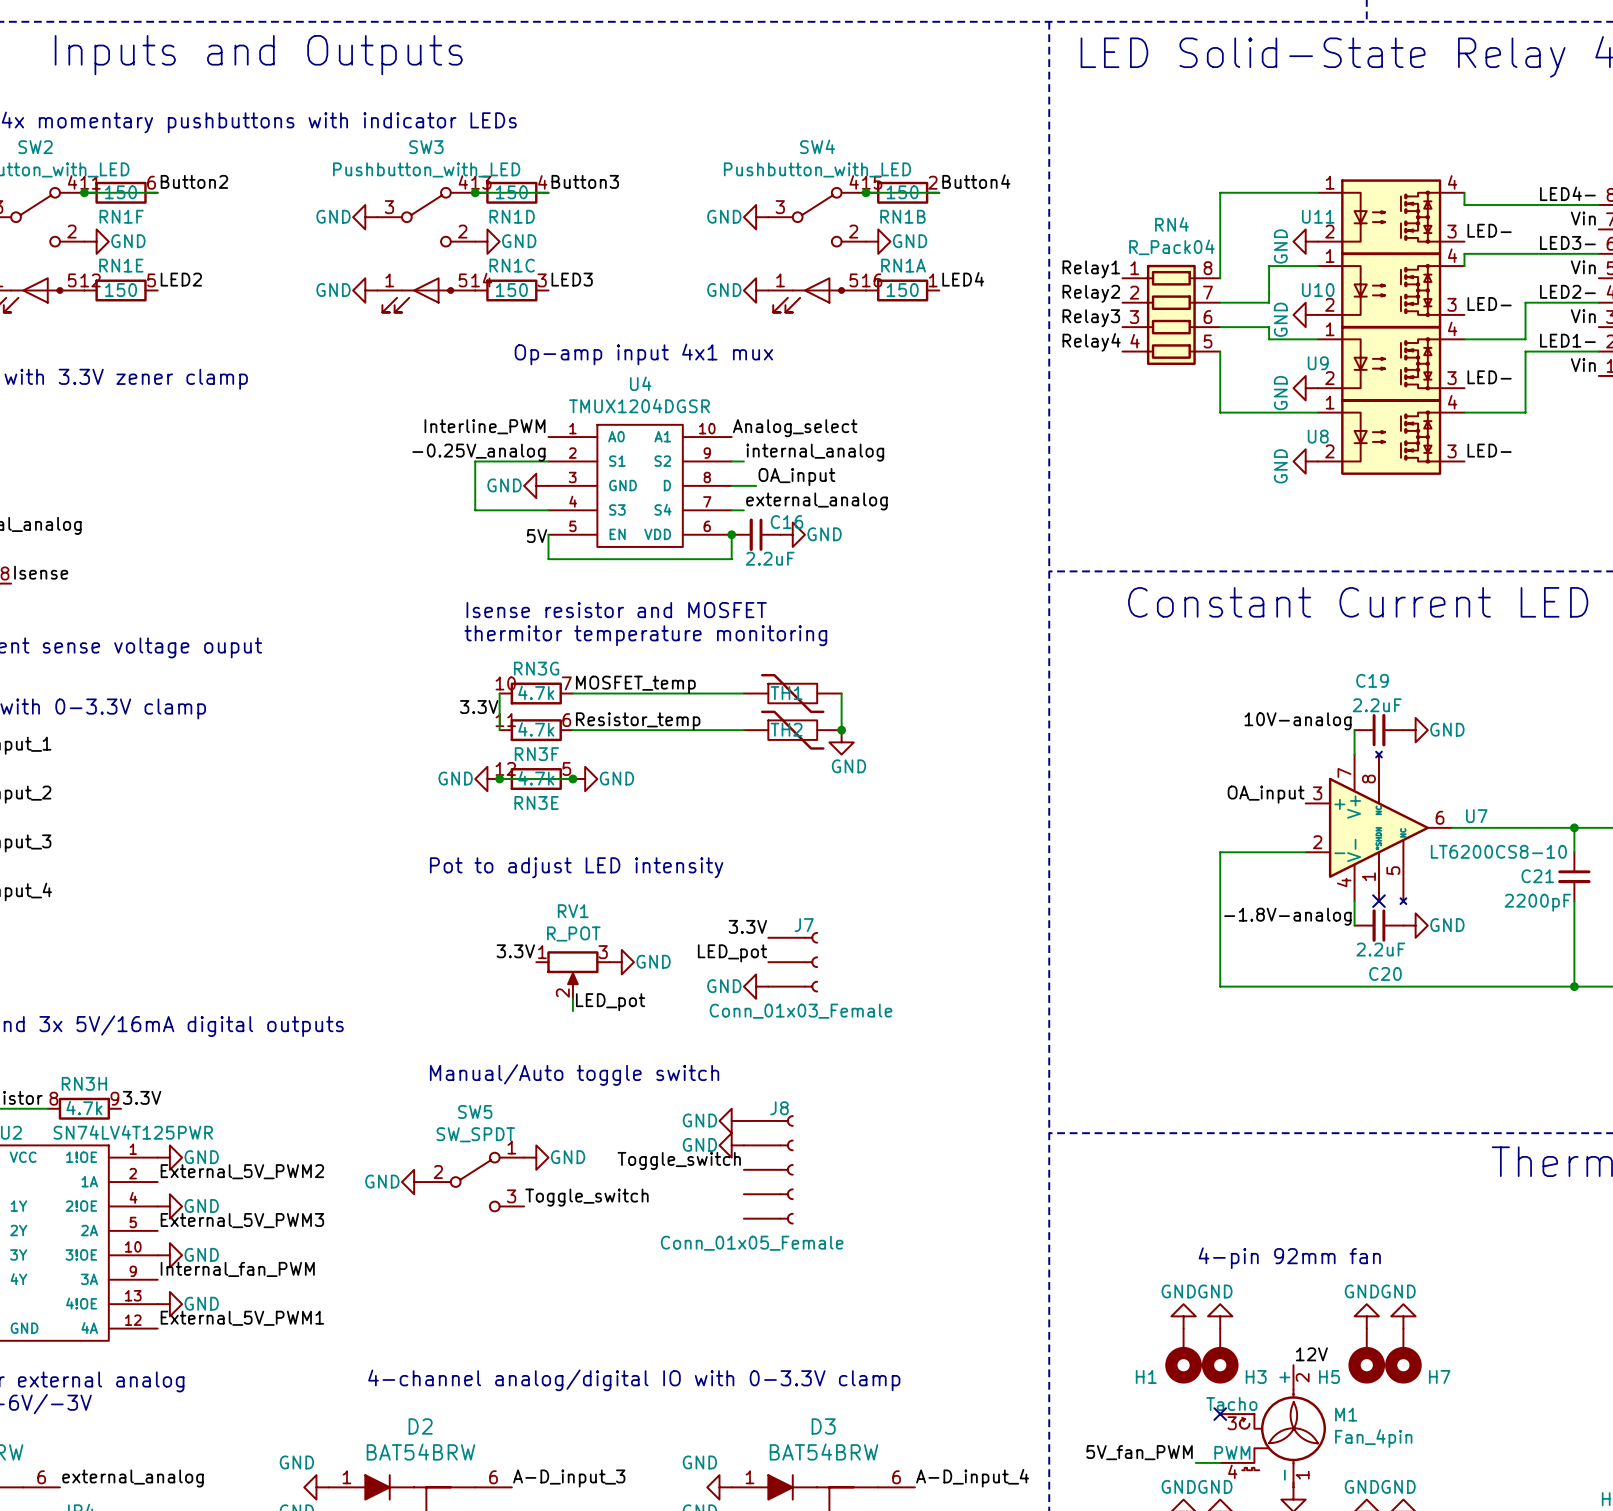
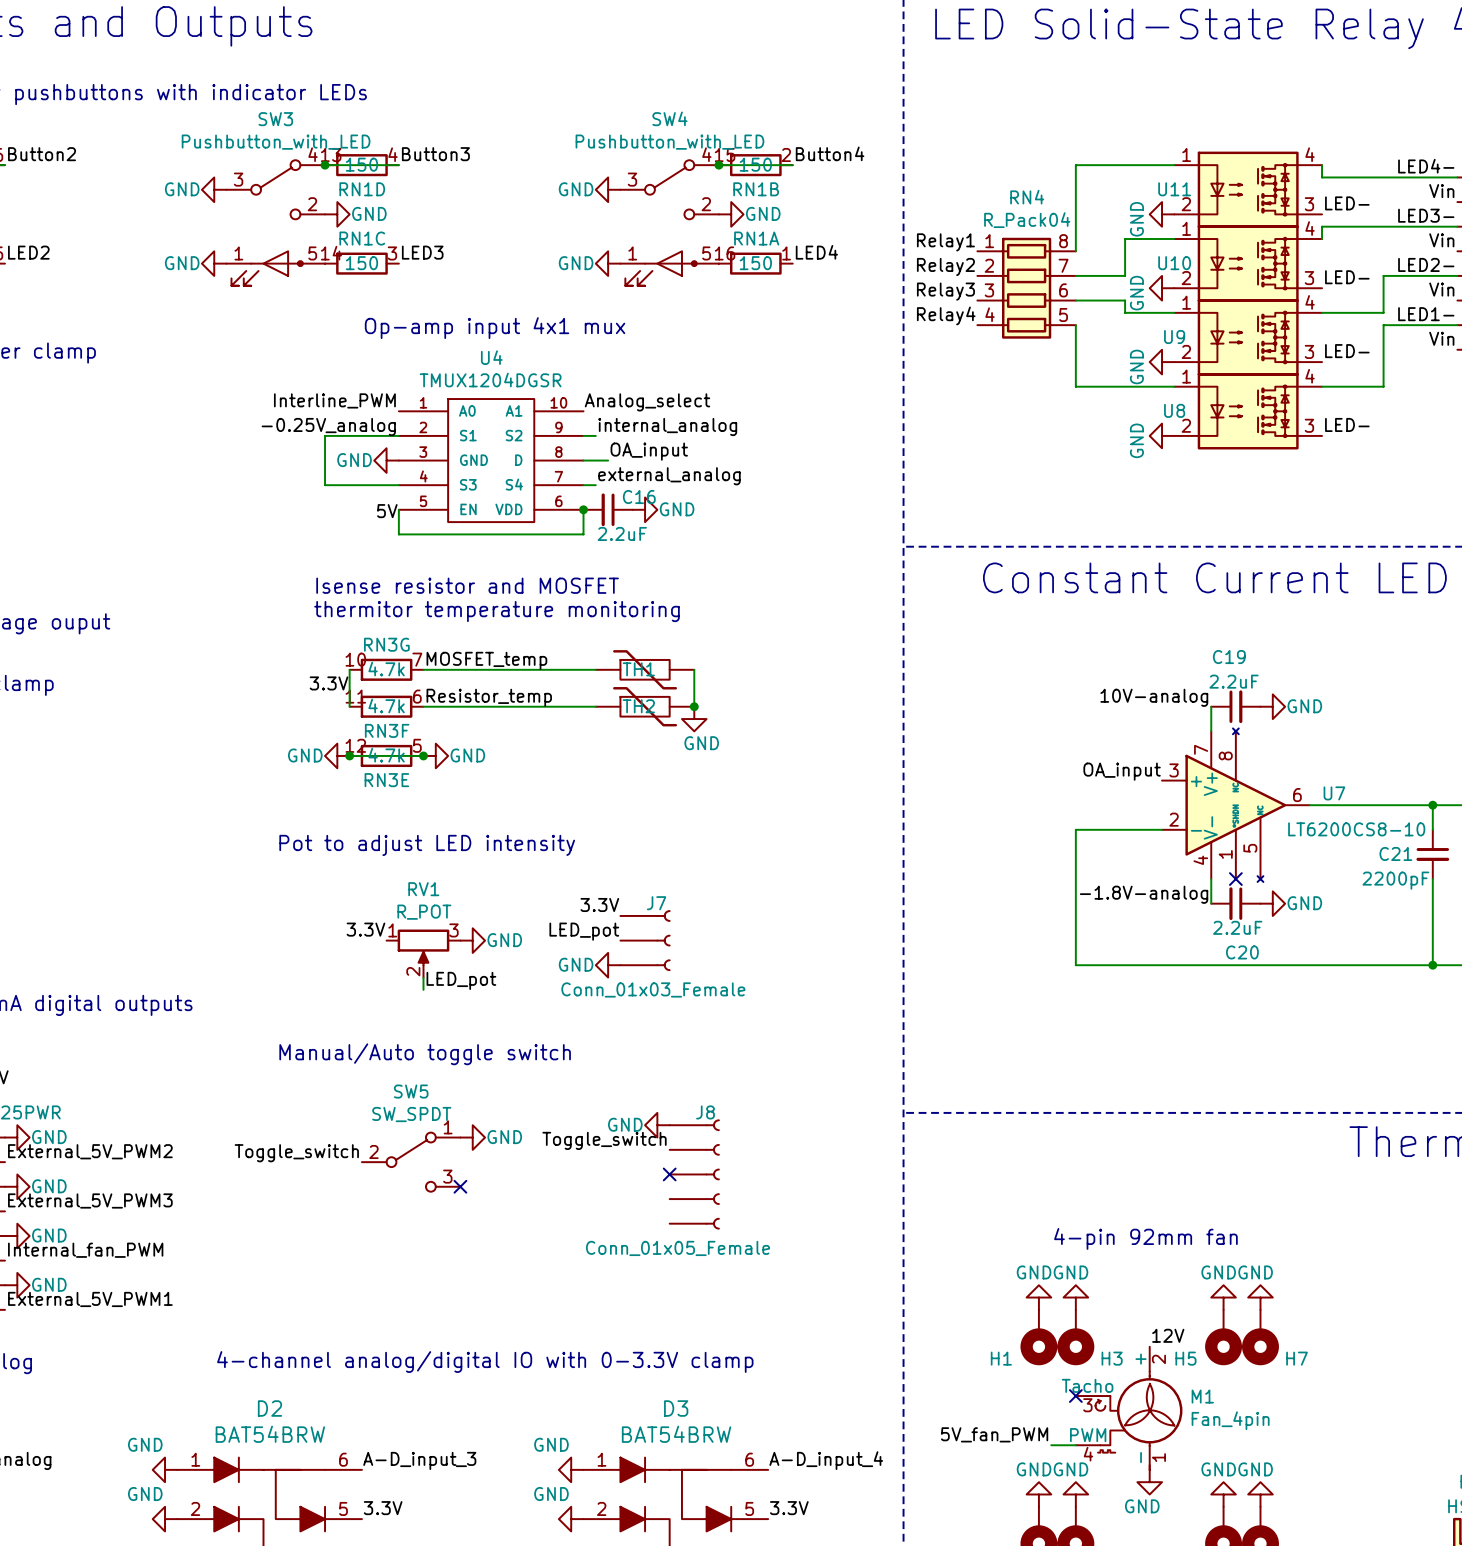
power symbol: GND (731, 1120) -> none
power symbol: GND (731, 1145) -> none
power symbol: none -> GND (657, 1125)
power symbol: GND (536, 1157) -> none
power symbol: none -> GND (472, 1137)
label position: Toggle_switch (679, 1160) -> Toggle_switch (604, 1140)
J8 position: (768, 1169) -> (694, 1174)
power symbol: GND (414, 1182) -> none
SW5 position: (475, 1182) -> (411, 1162)
no-connect mark: none -> (669, 1174)
label position: Toggle_switch (586, 1197) -> Toggle_switch (296, 1153)
no-connect mark: none -> (460, 1186)

